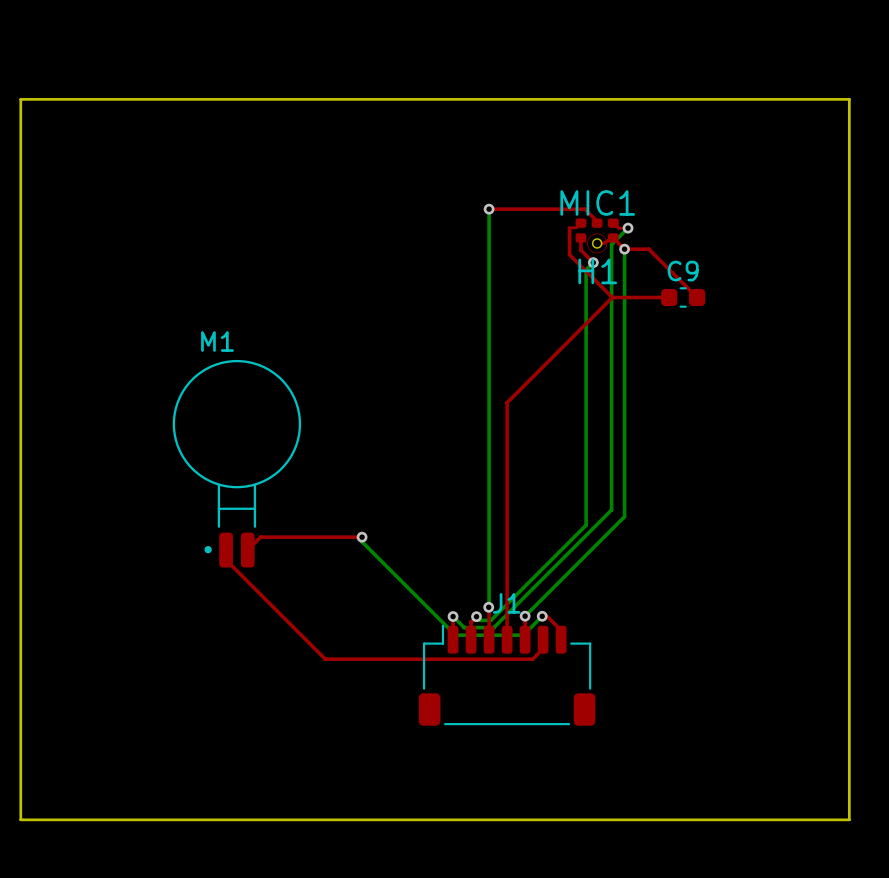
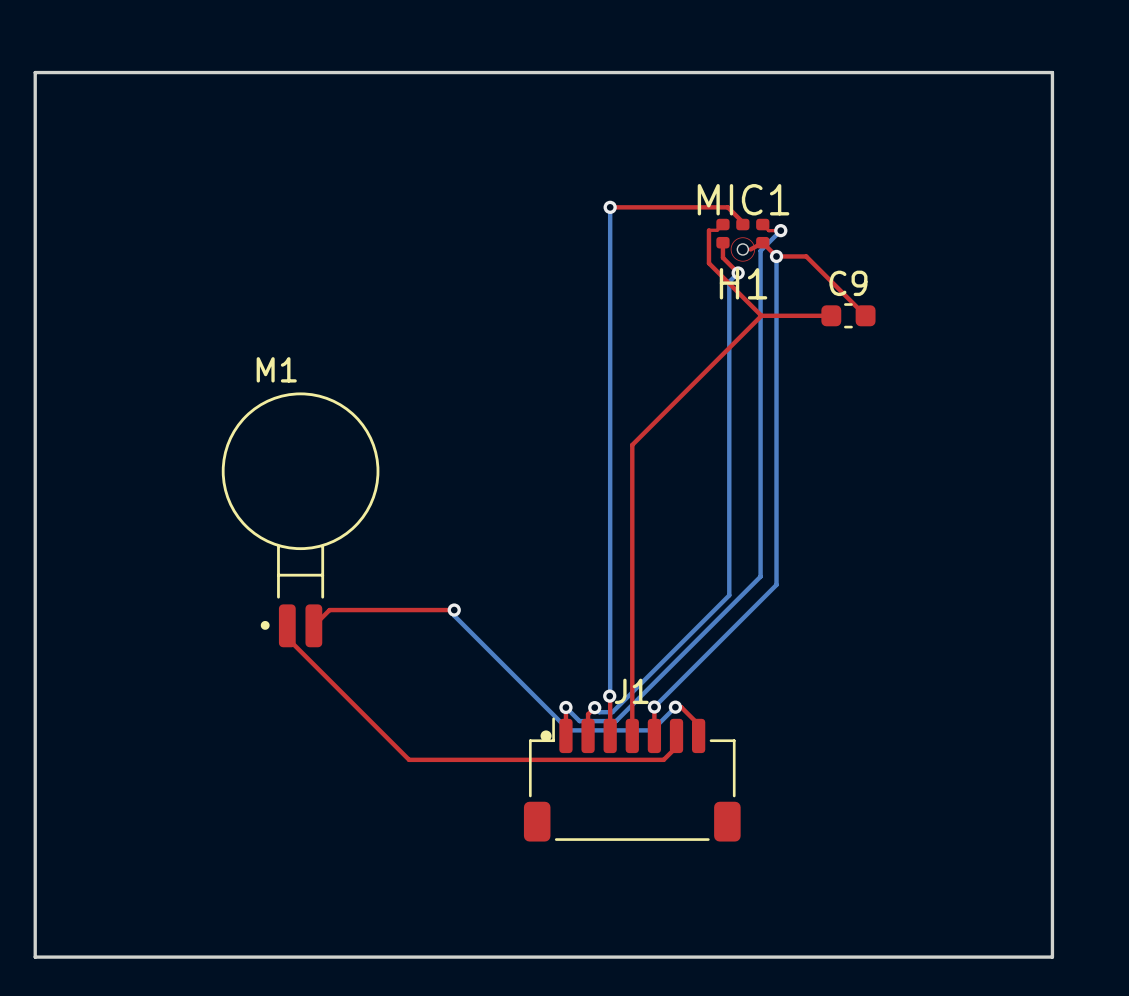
J1 footprint: [418, 624, 596, 726] -> [523, 717, 741, 842]

